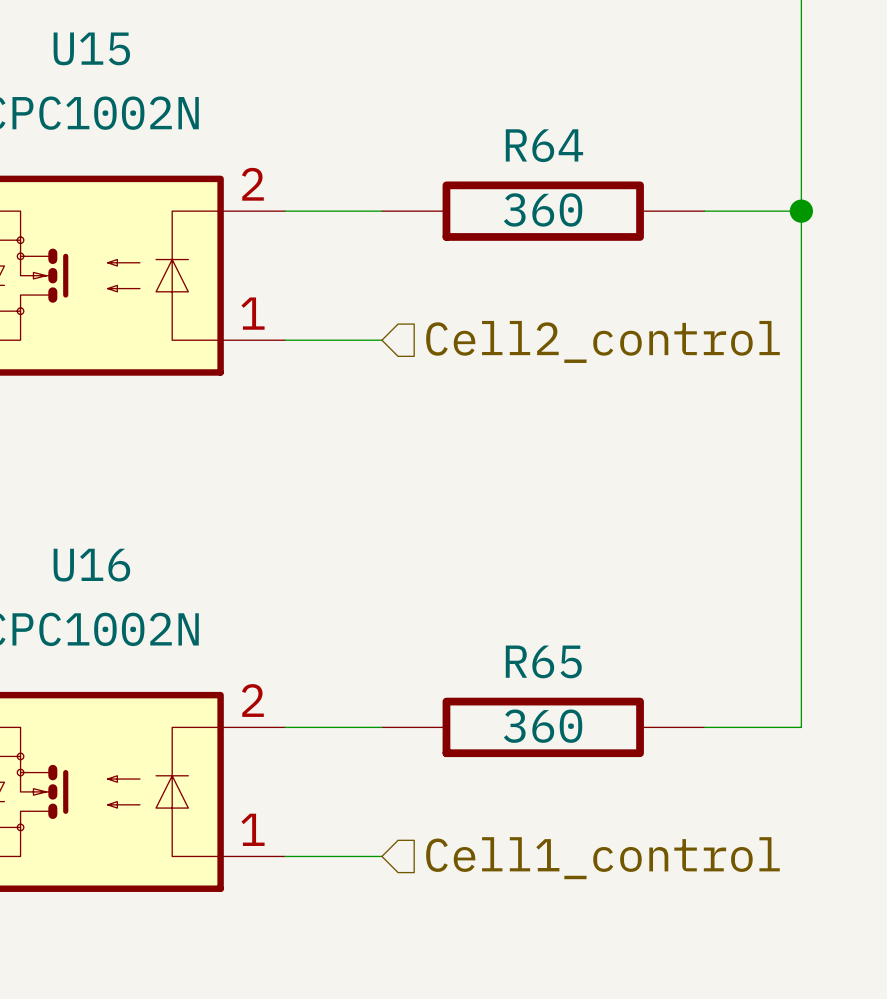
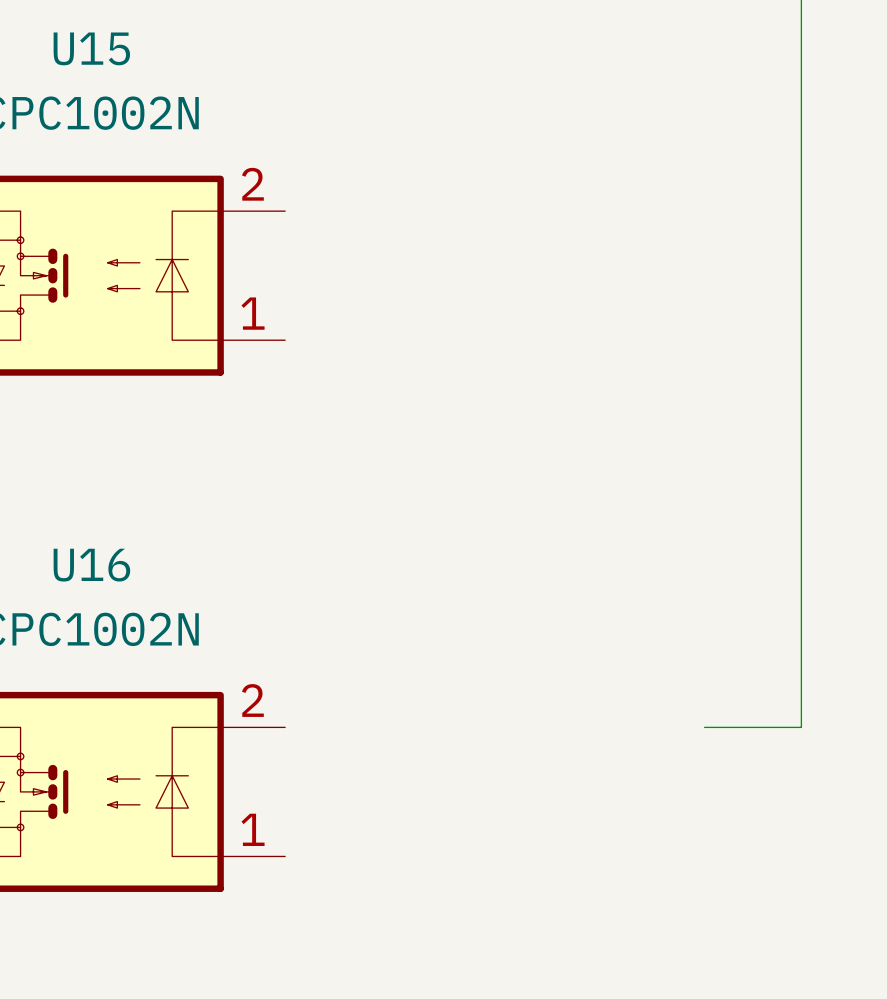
wire: (285, 211) (381, 211) -> none
R64: 360 (543, 211) -> none
wire: (704, 211) (801, 211) -> none
junction: (801, 211) -> none
wire: (285, 340) (381, 340) -> none
hierarchical label: Cell2_control (602, 341) -> none
wire: (285, 727) (381, 727) -> none
R65: 360 (543, 727) -> none
wire: (285, 856) (381, 856) -> none
hierarchical label: Cell1_control (602, 858) -> none

